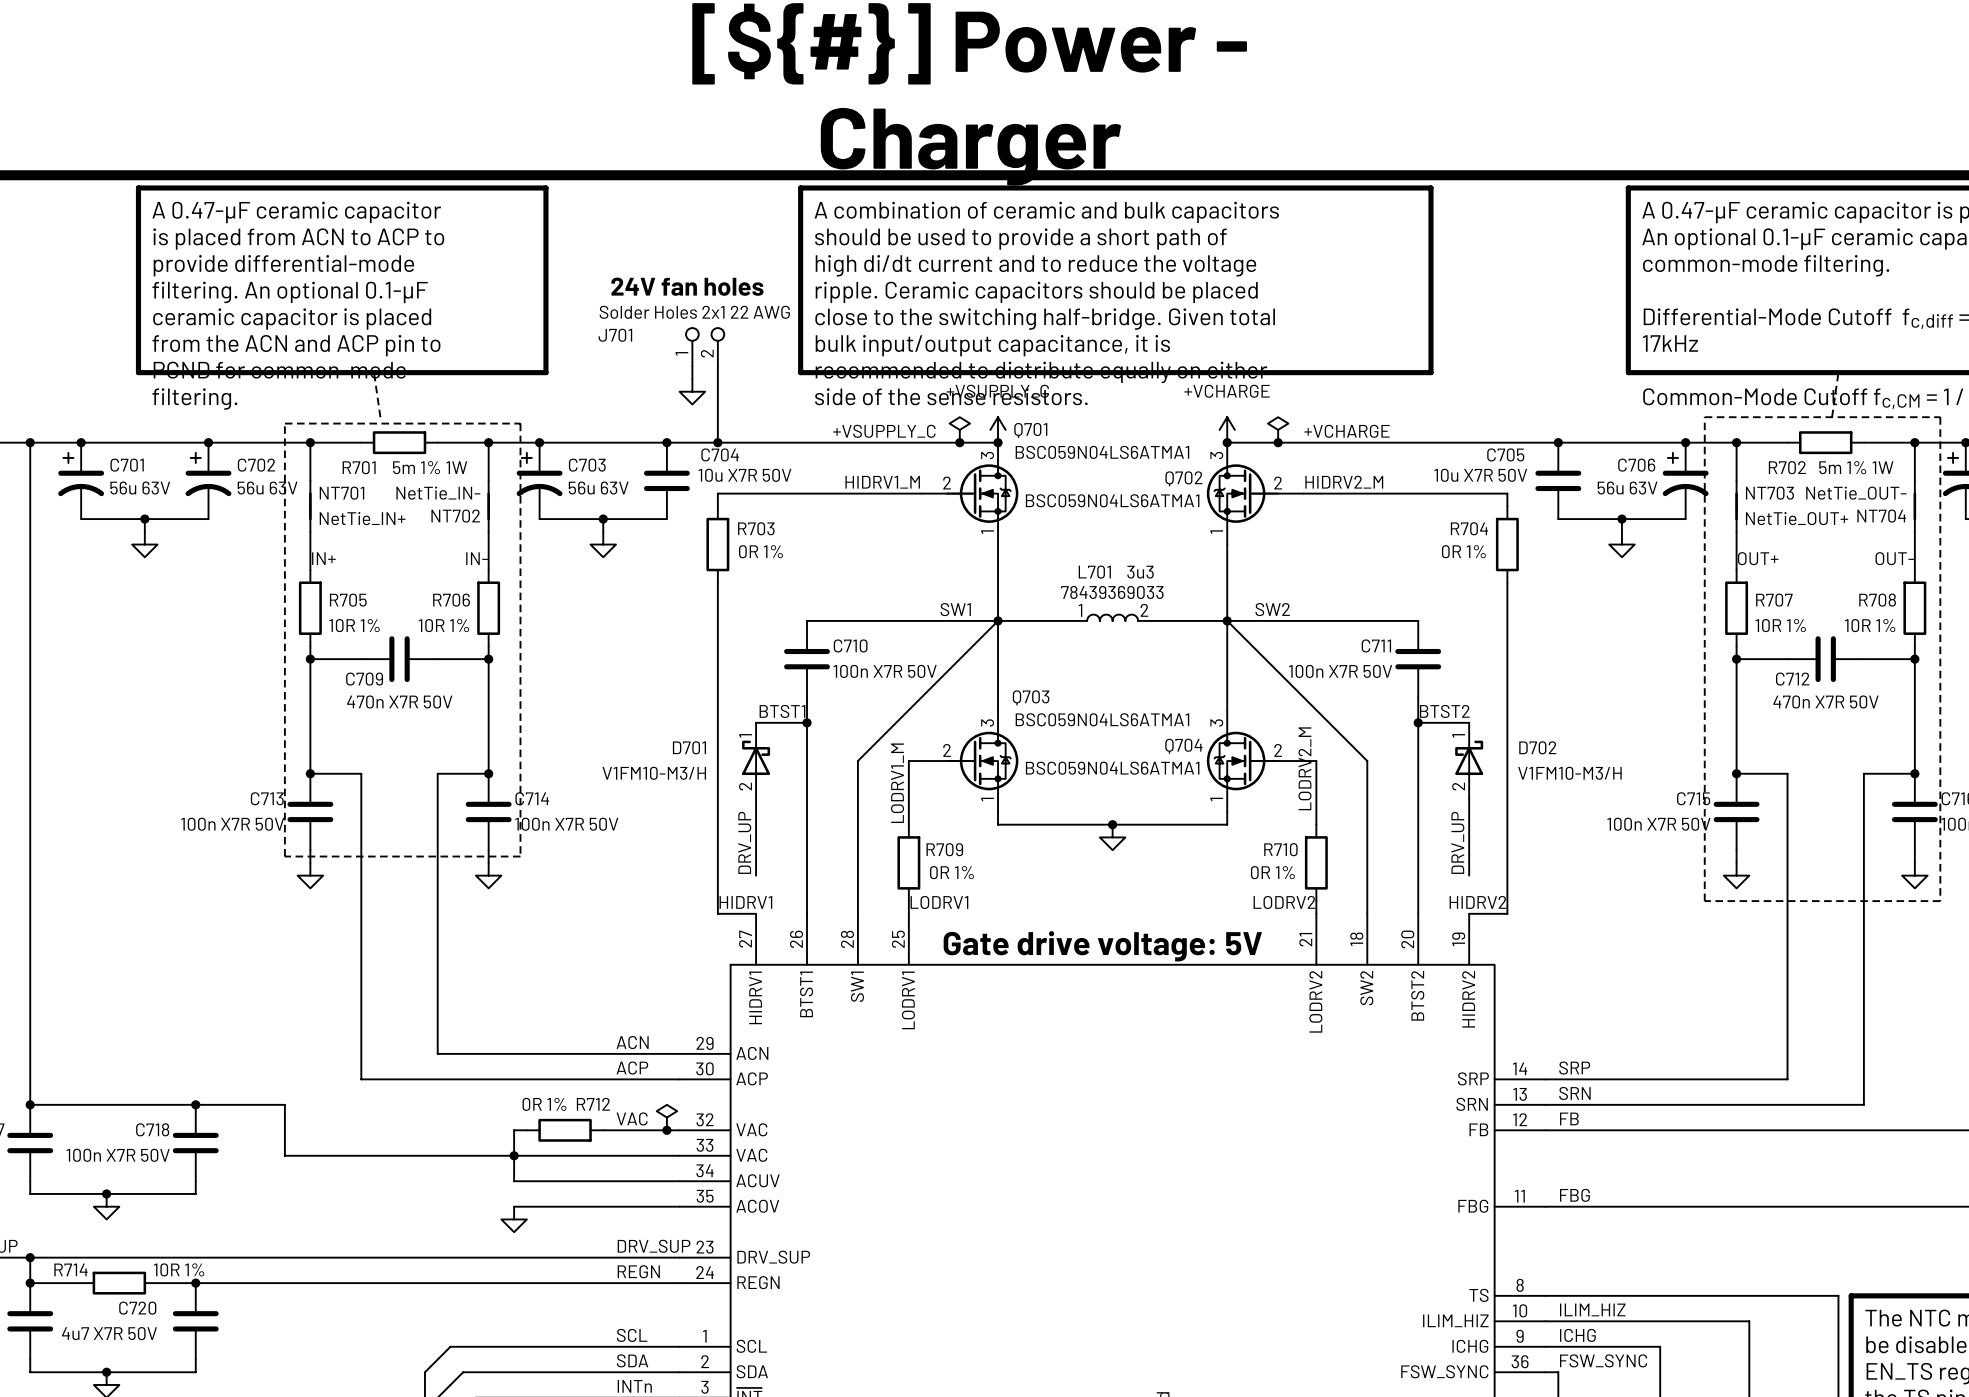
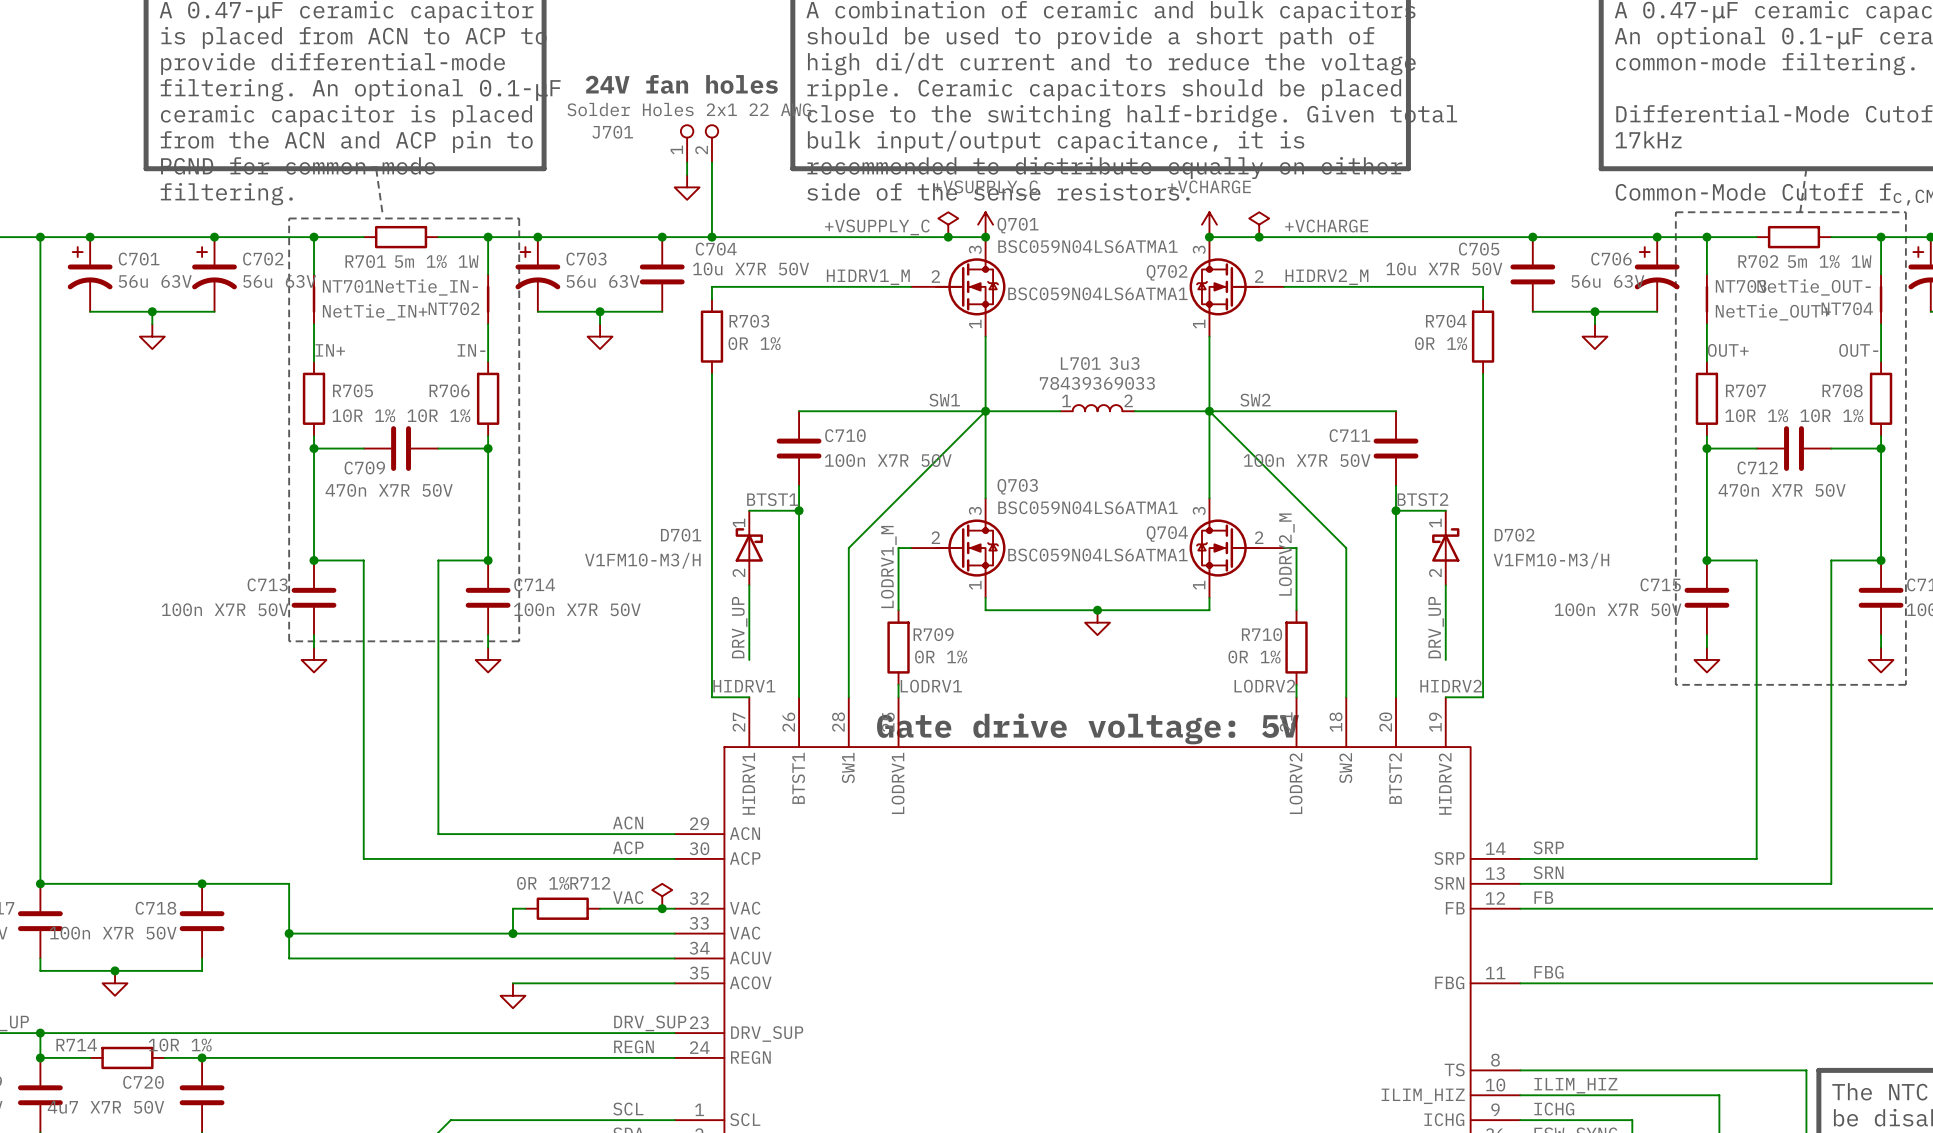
junction: none -> (289, 933)
wire: (514, 1155) (514, 1181) -> (289, 933) (289, 958) (512, 958)

